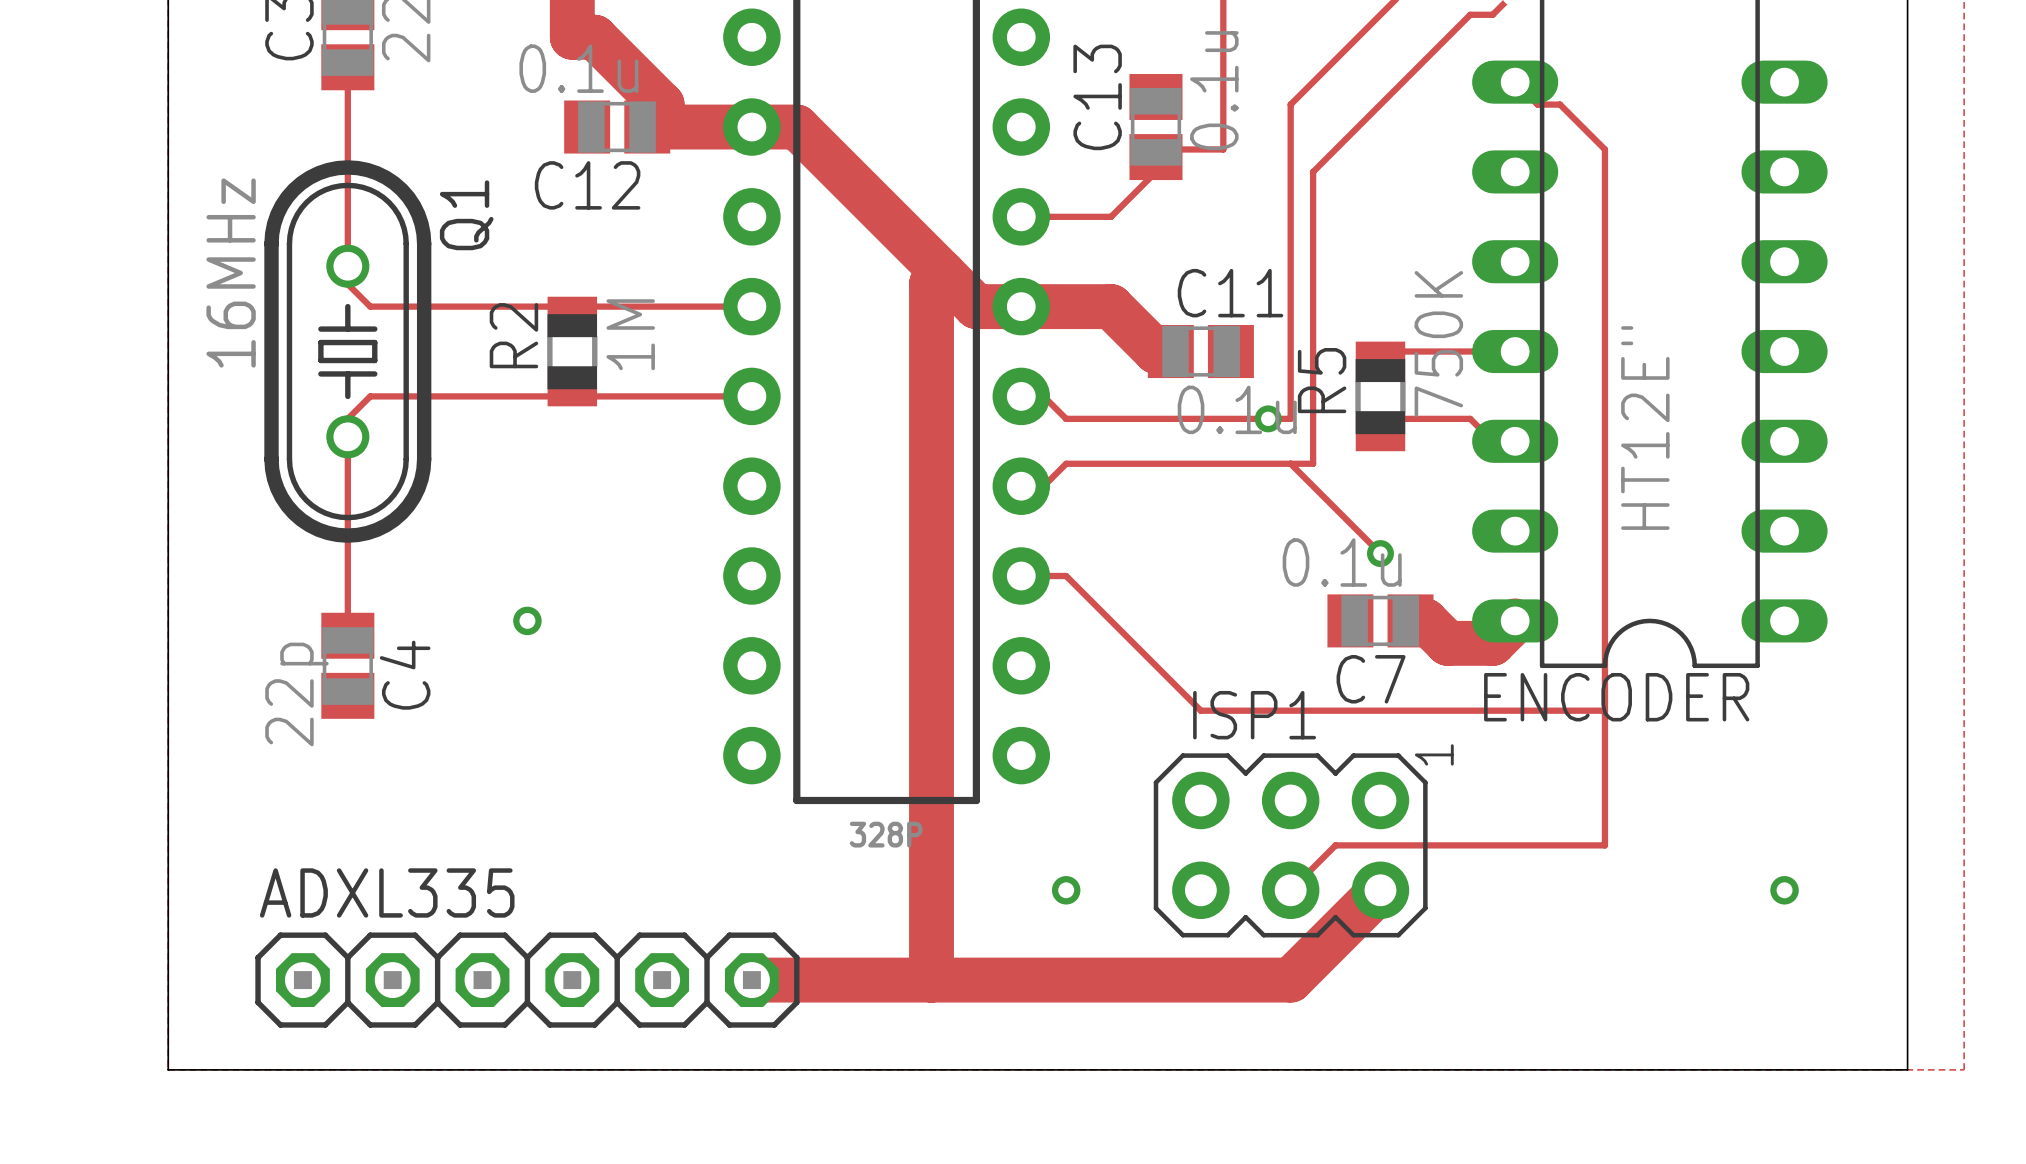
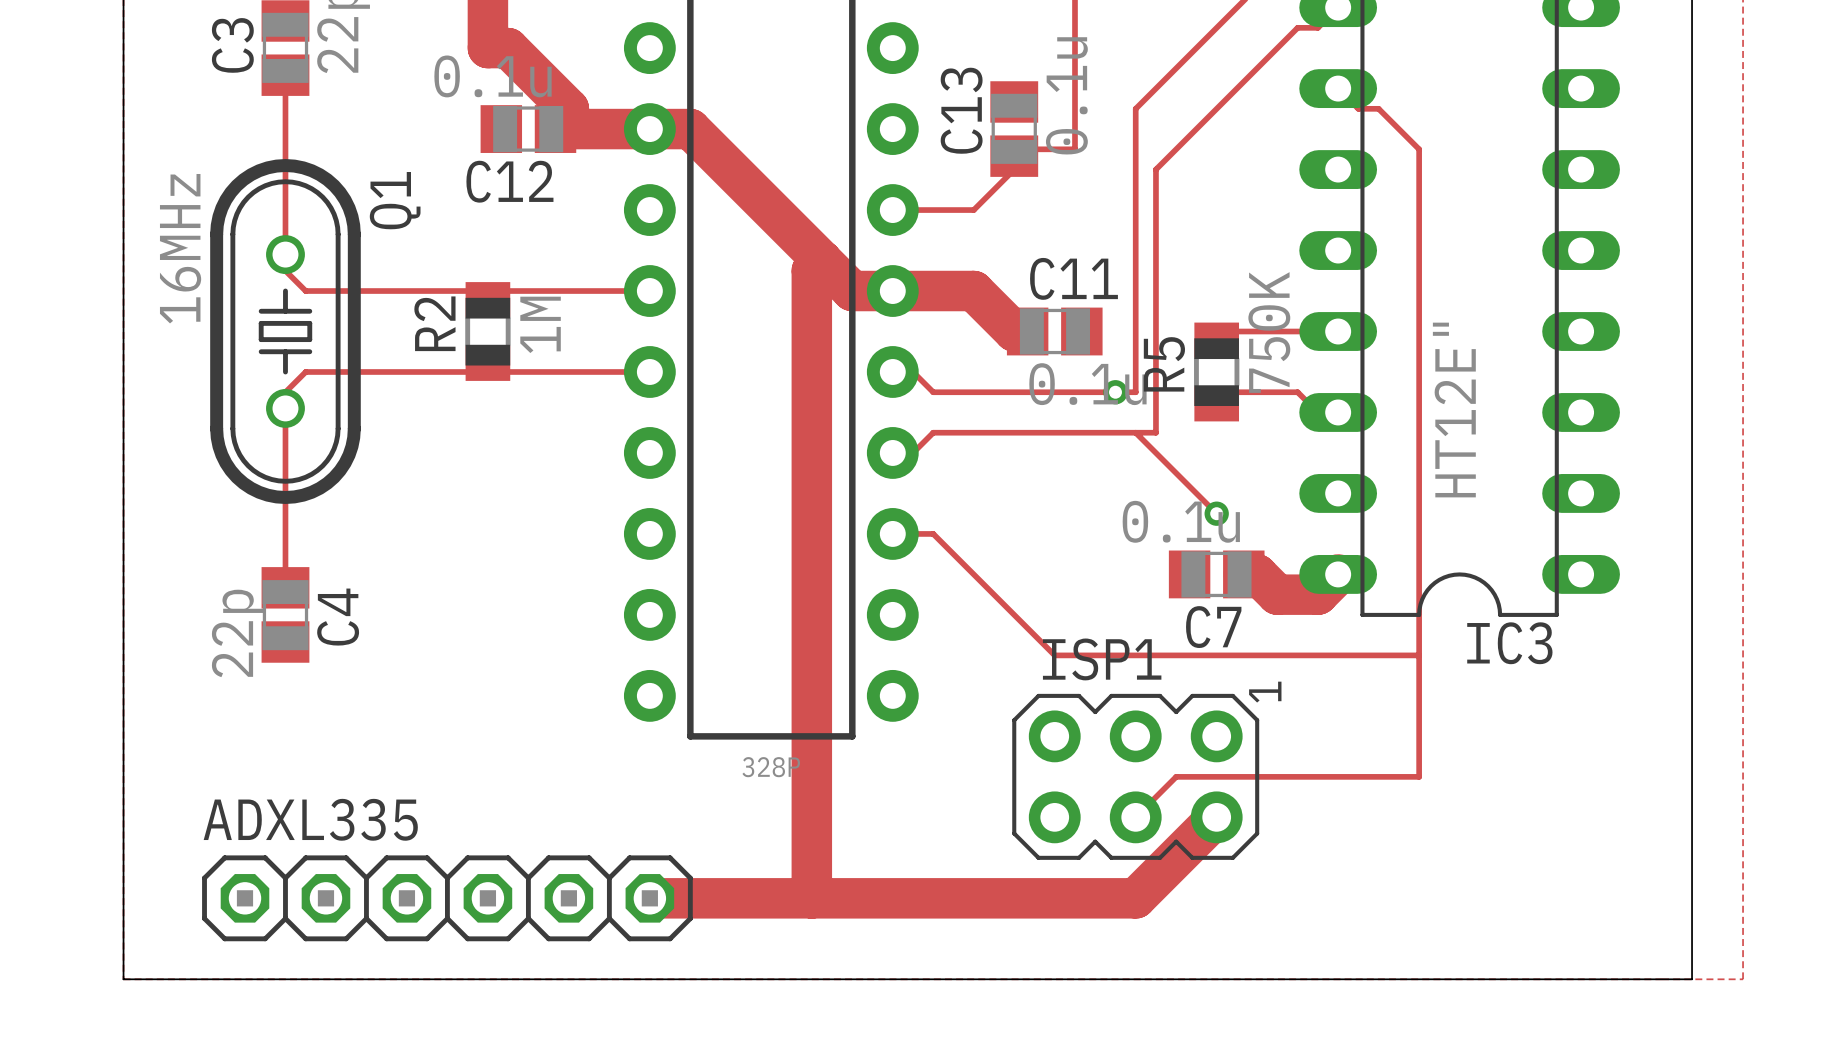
via: (527, 620) -> none
ENCODER name: ENCODER (1616, 697) -> IC3 (1509, 643)
via: (1066, 890) -> none
via: (1784, 890) -> none

